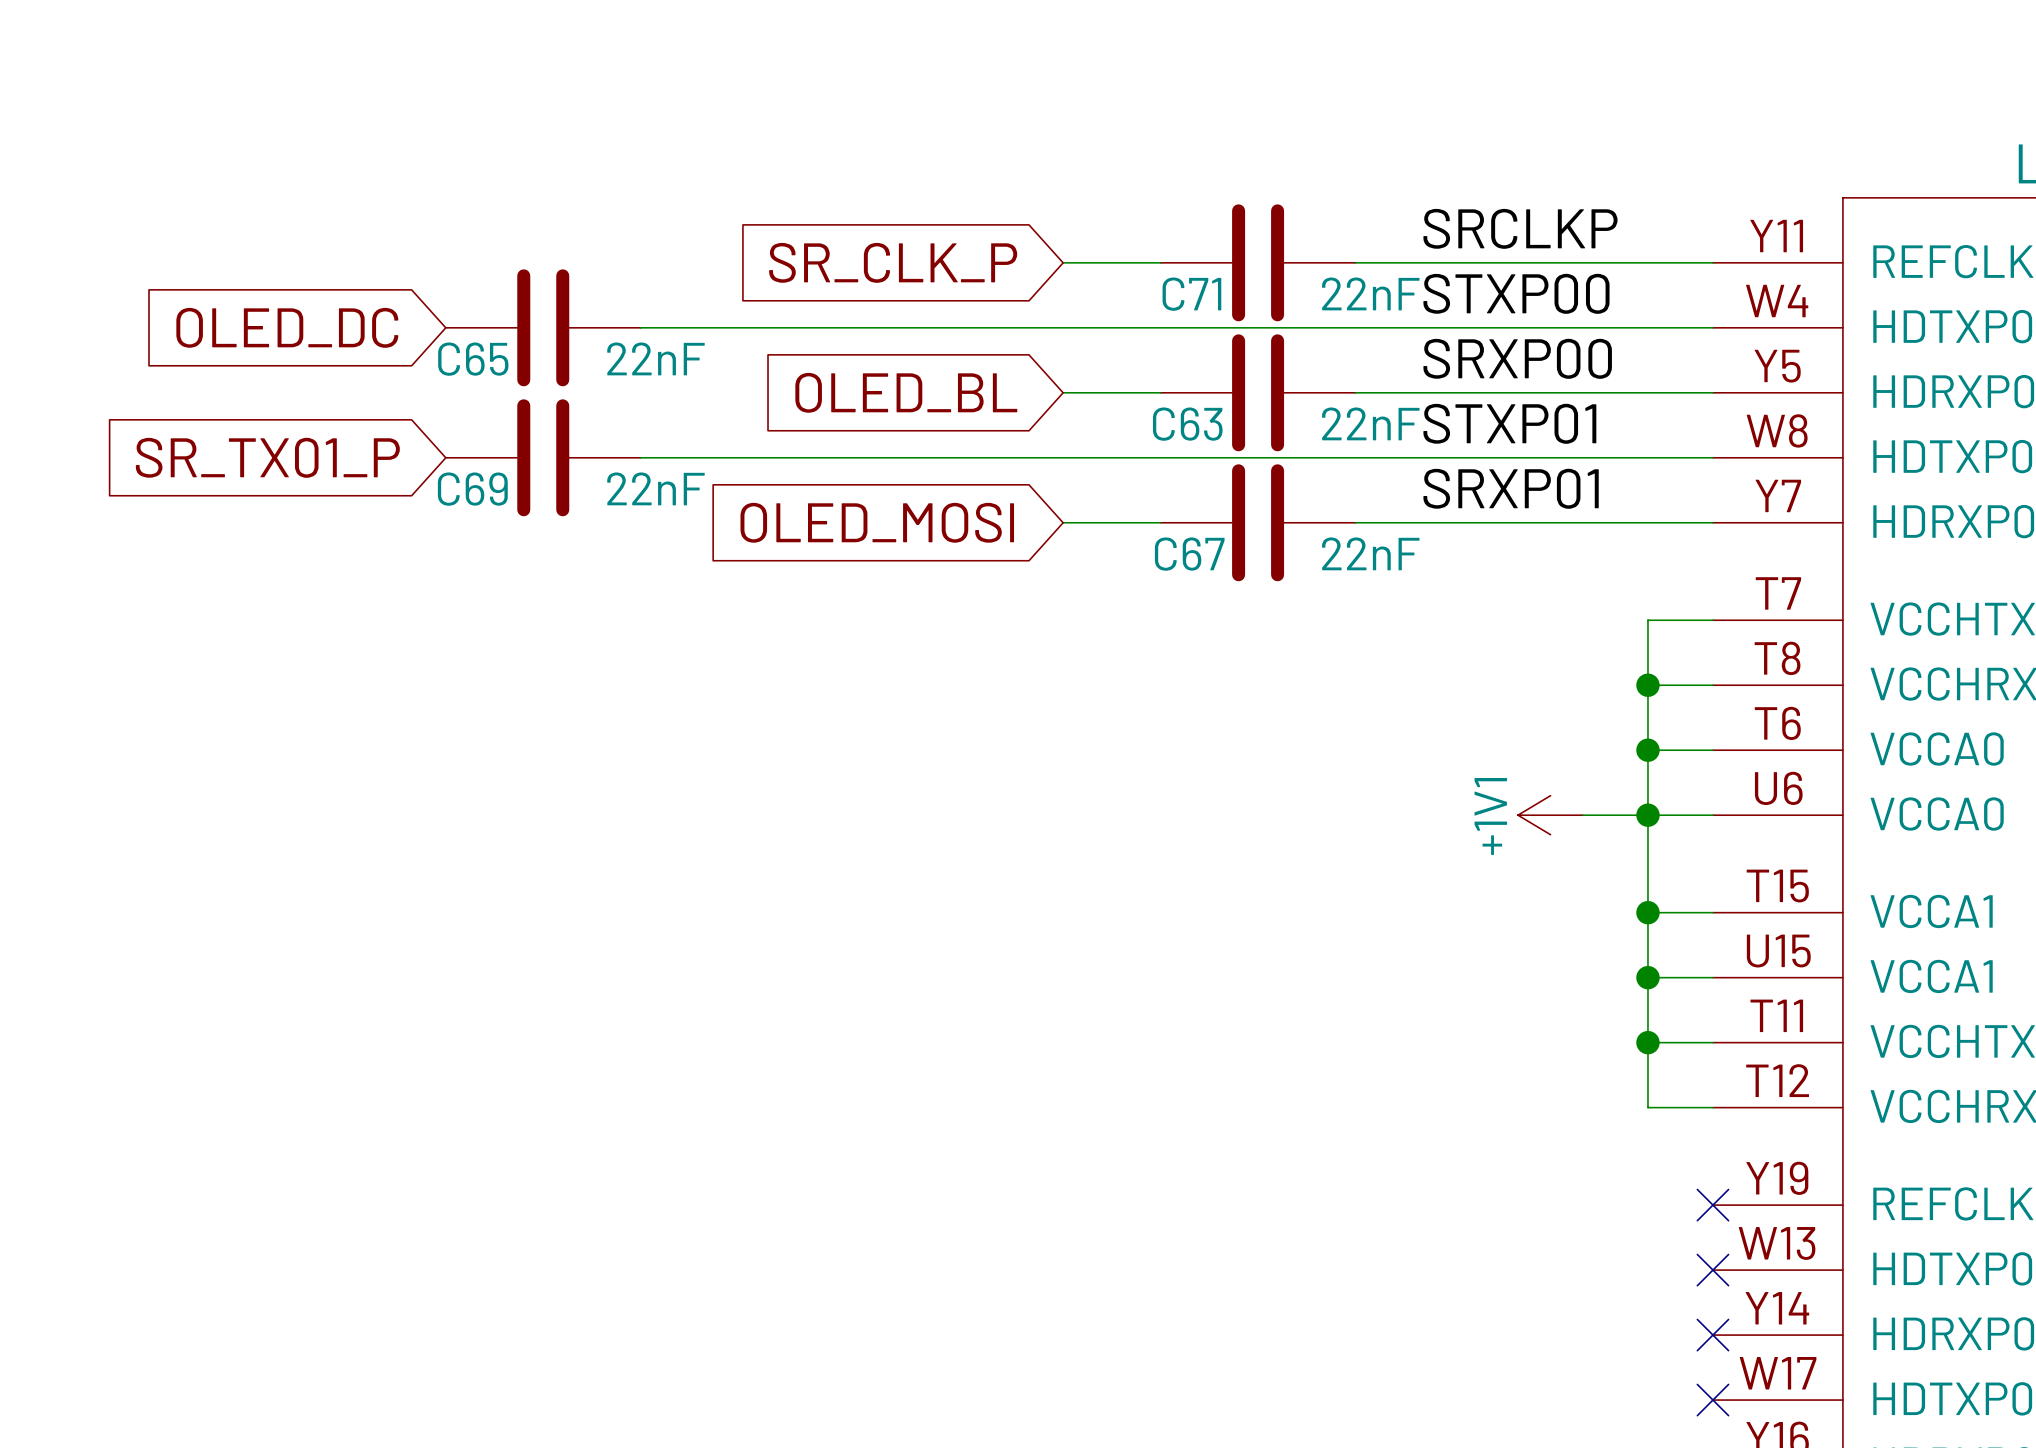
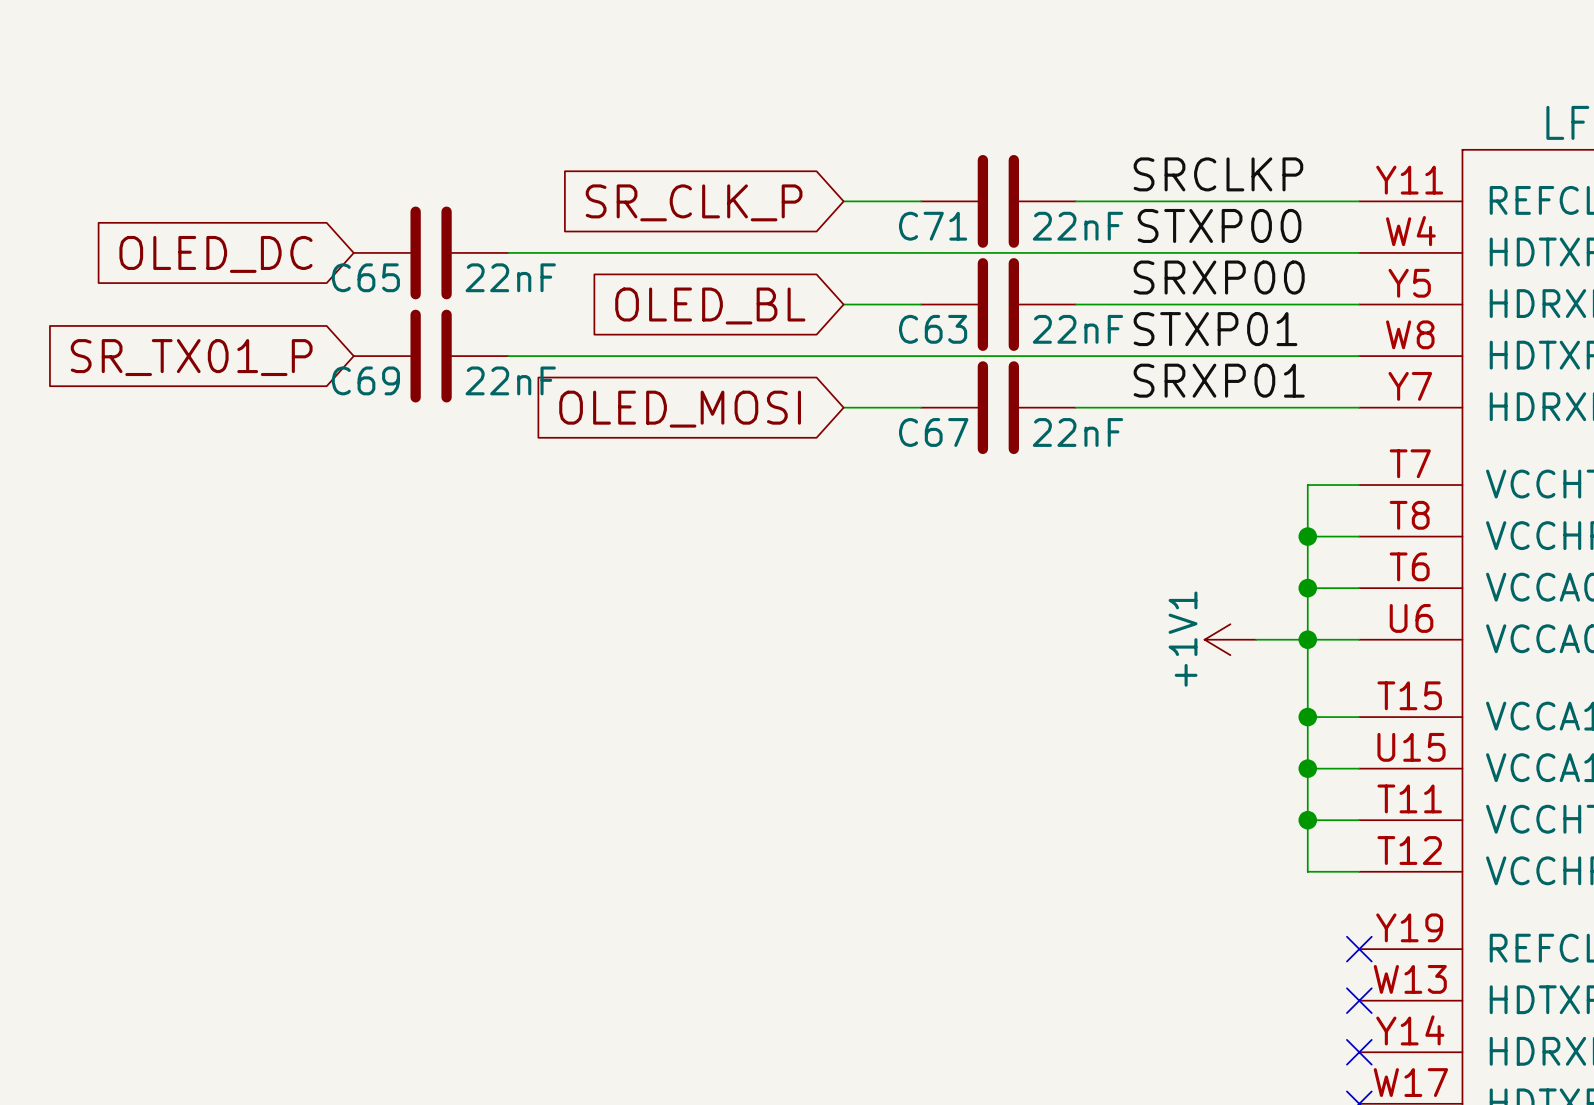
label position: STXP00 (1516, 293) -> STXP00 (1219, 225)

